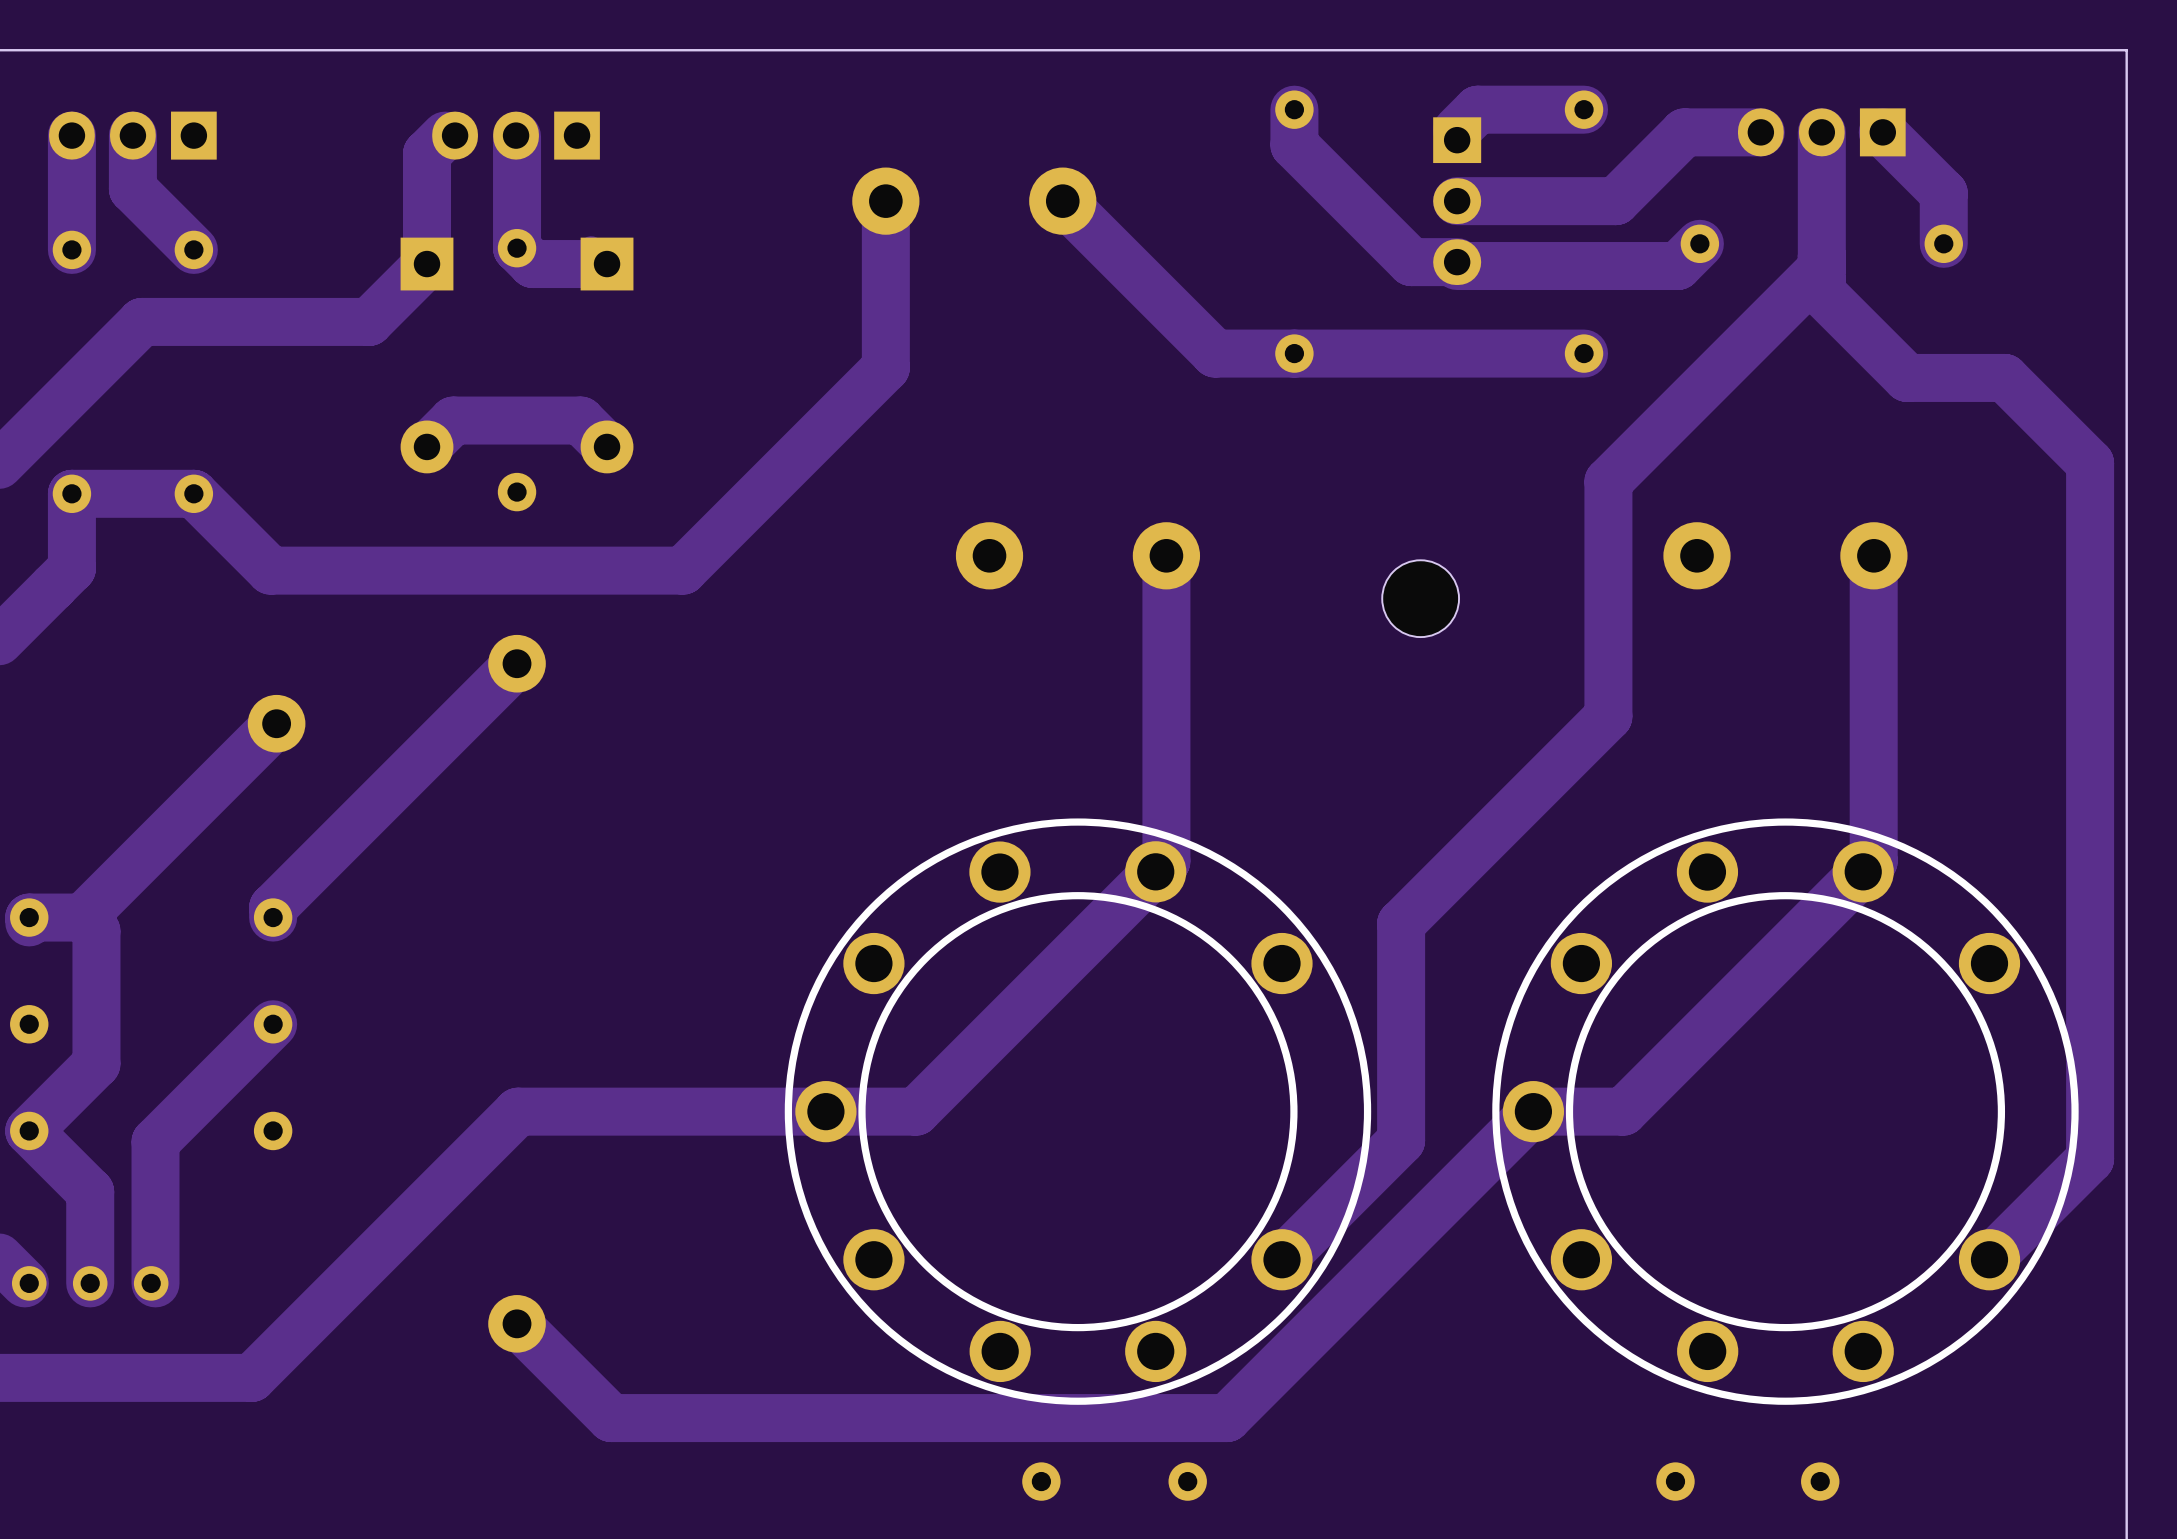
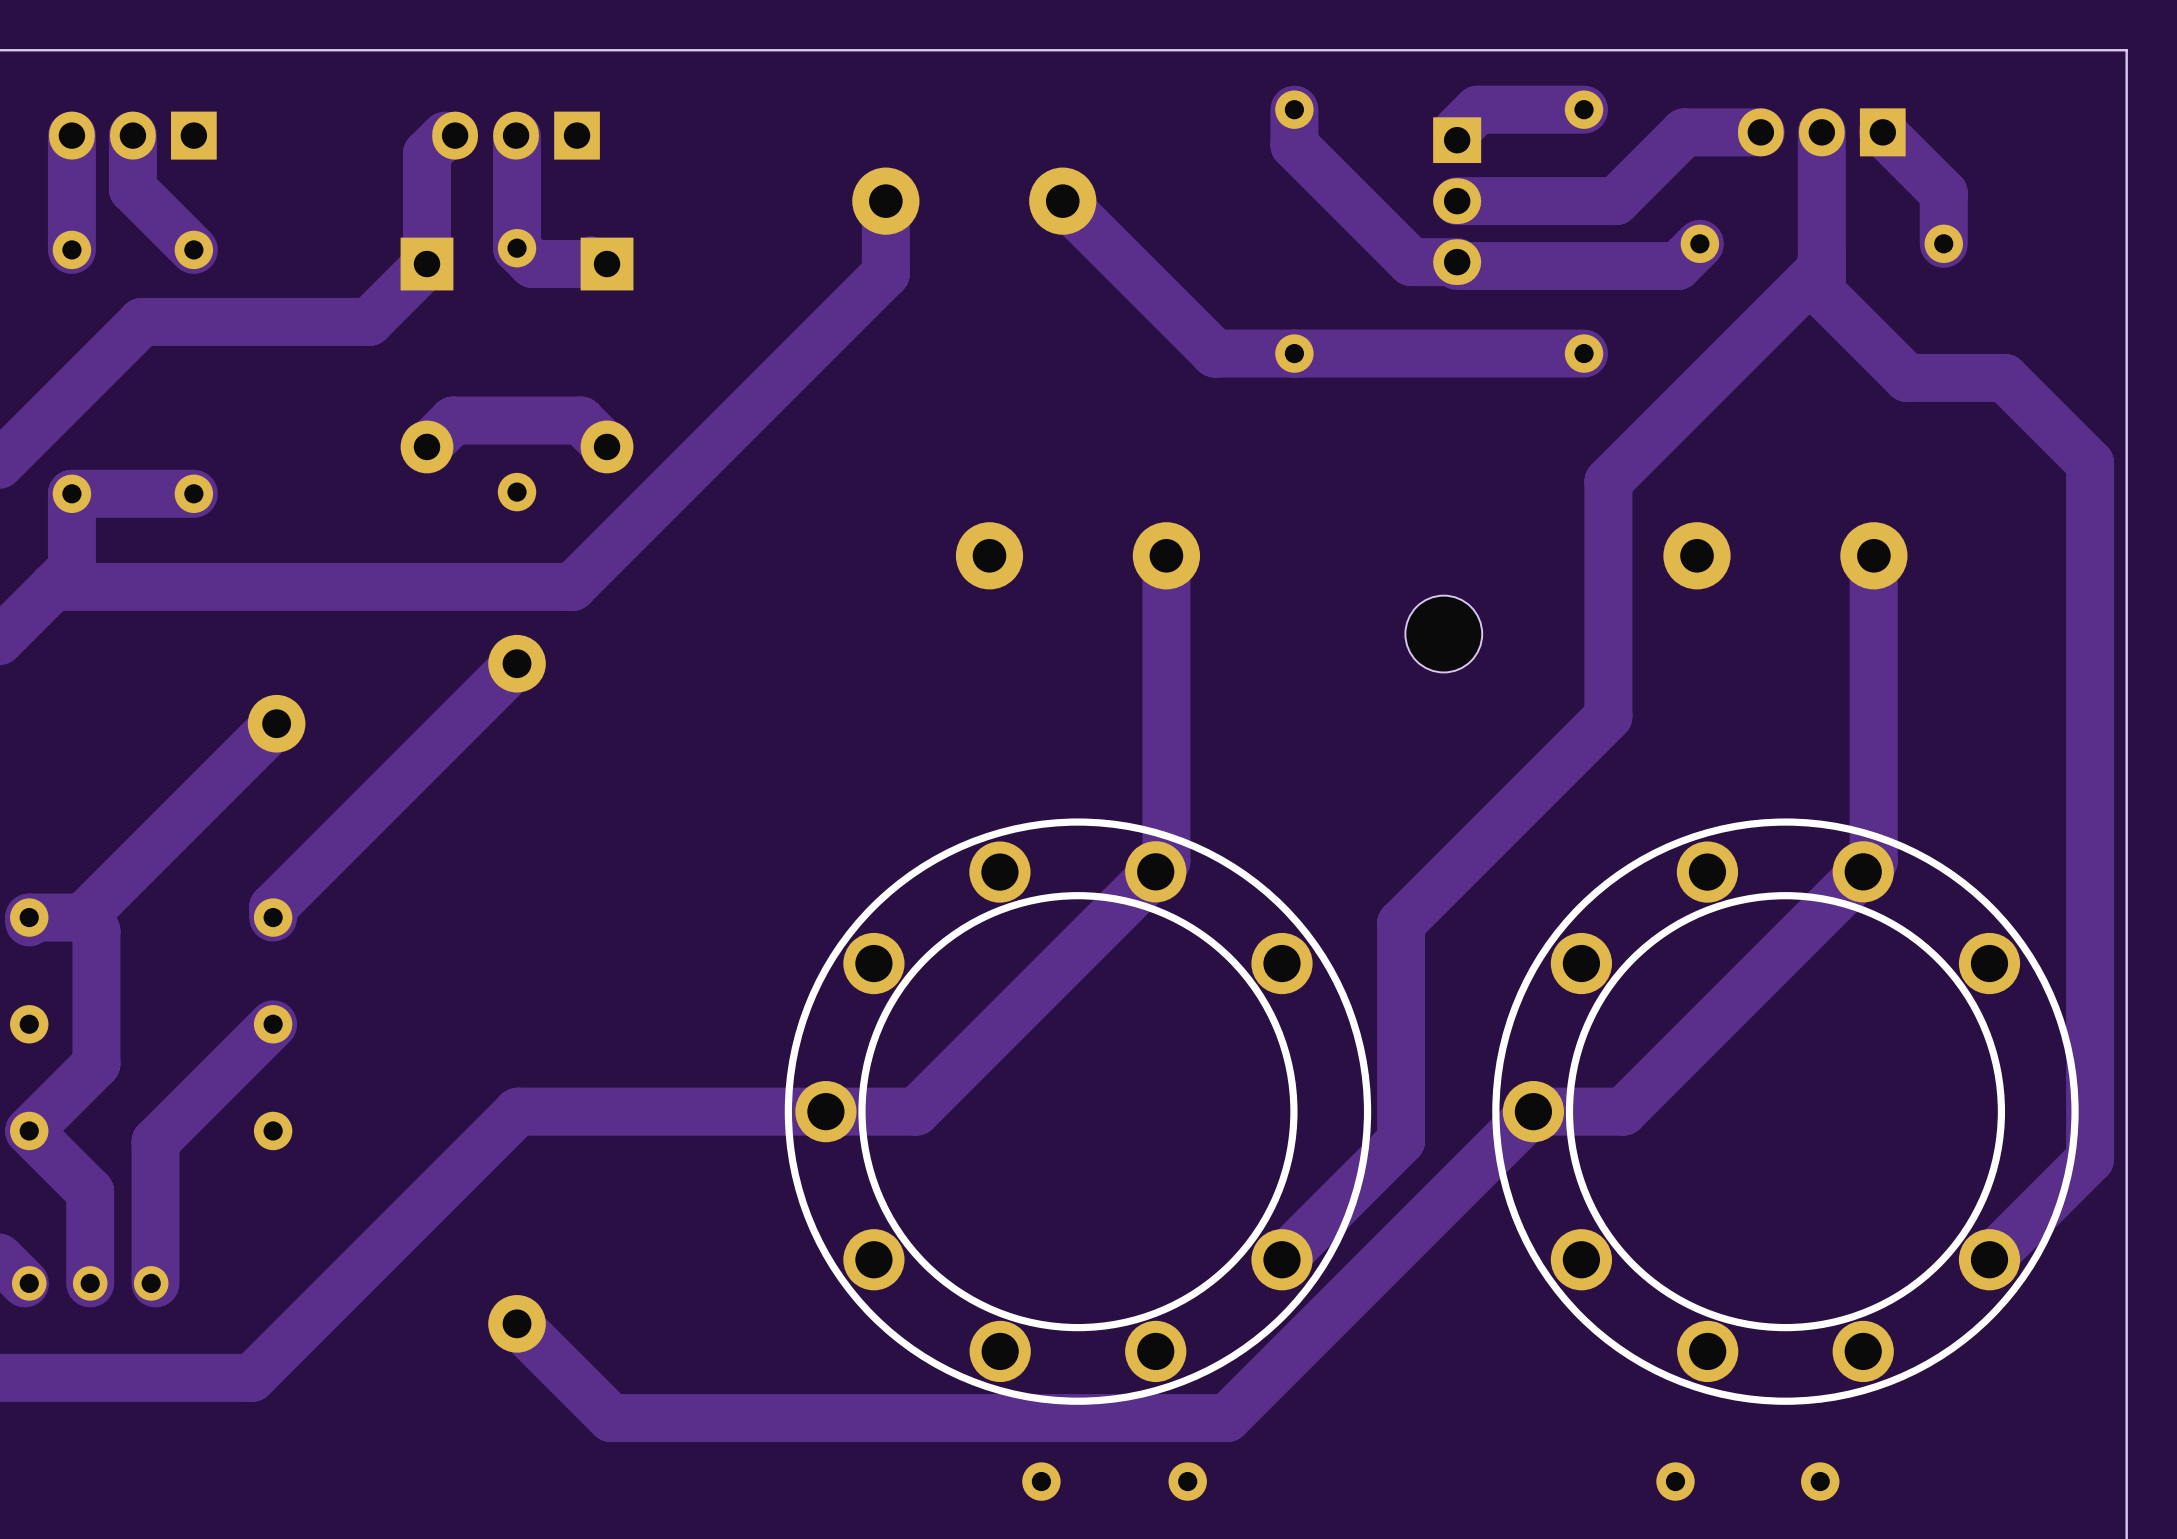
track: (885, 273) (885, 367) (682, 570) (270, 570) (193, 493) -> (885, 273) (572, 586) (53, 586)
part position: (1420, 598) -> (1443, 634)

